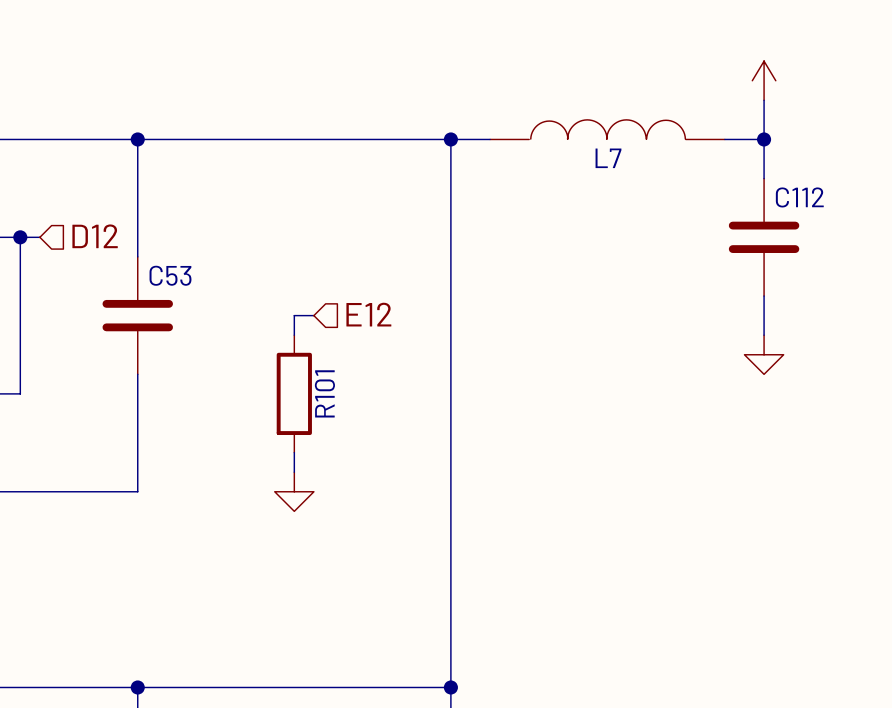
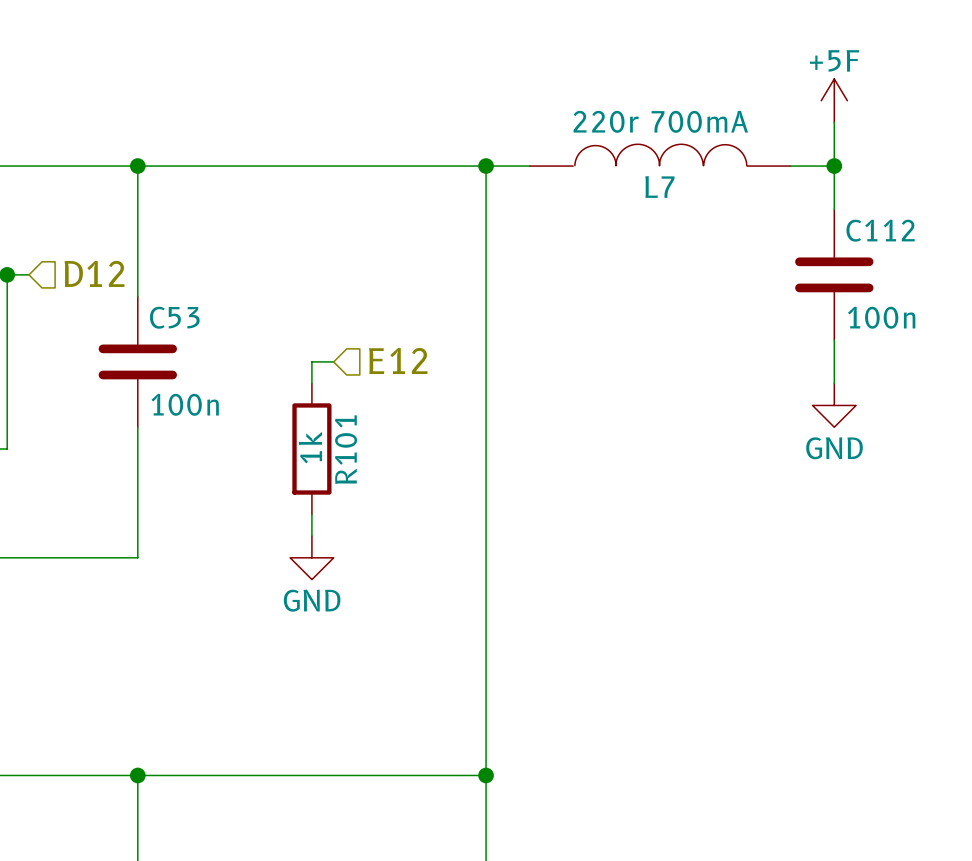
power symbol text: none -> +5F (834, 60)
L7 value: none -> 220r 700mA (660, 121)
C112 value: none -> 100n (881, 317)
C53 value: none -> 100n (185, 404)
R101 value: none -> 1k (310, 447)
power symbol text: none -> GND (834, 448)
power symbol text: none -> GND (312, 600)

